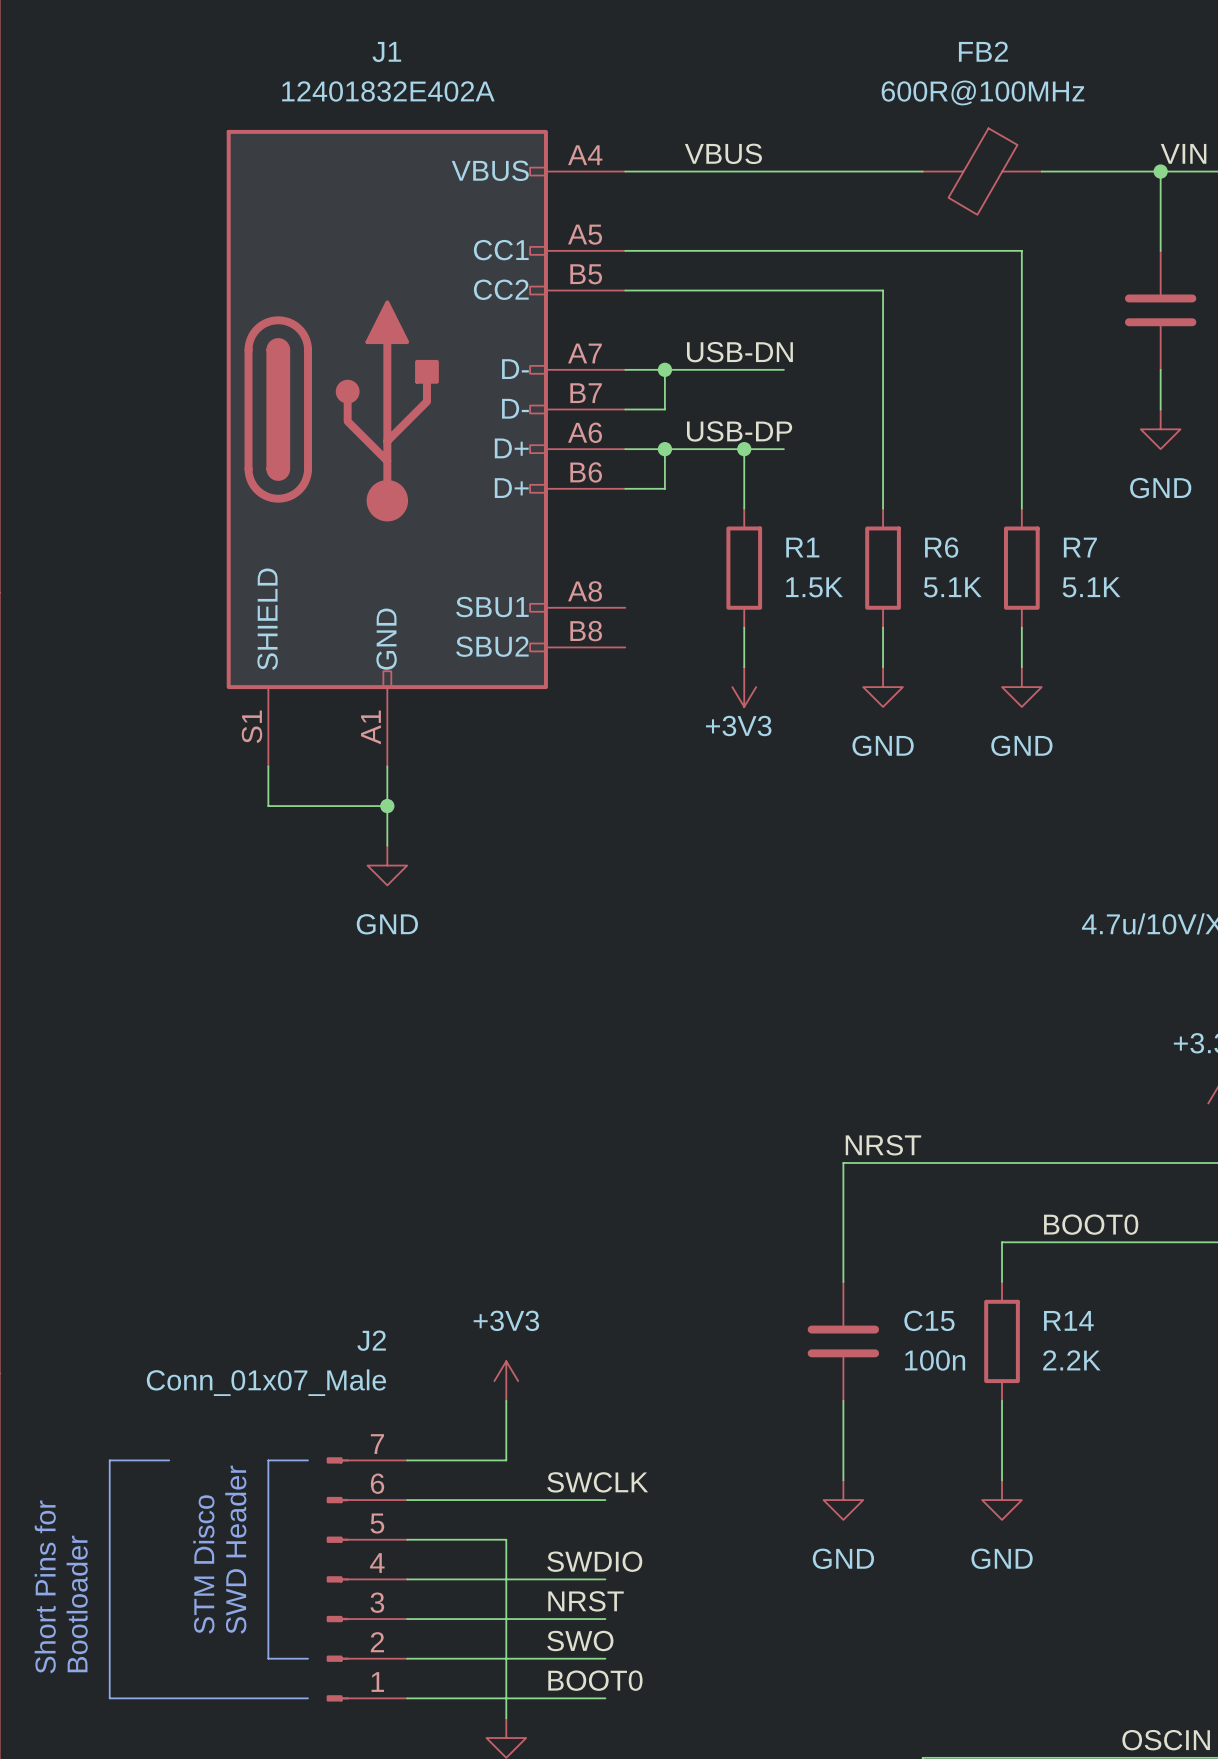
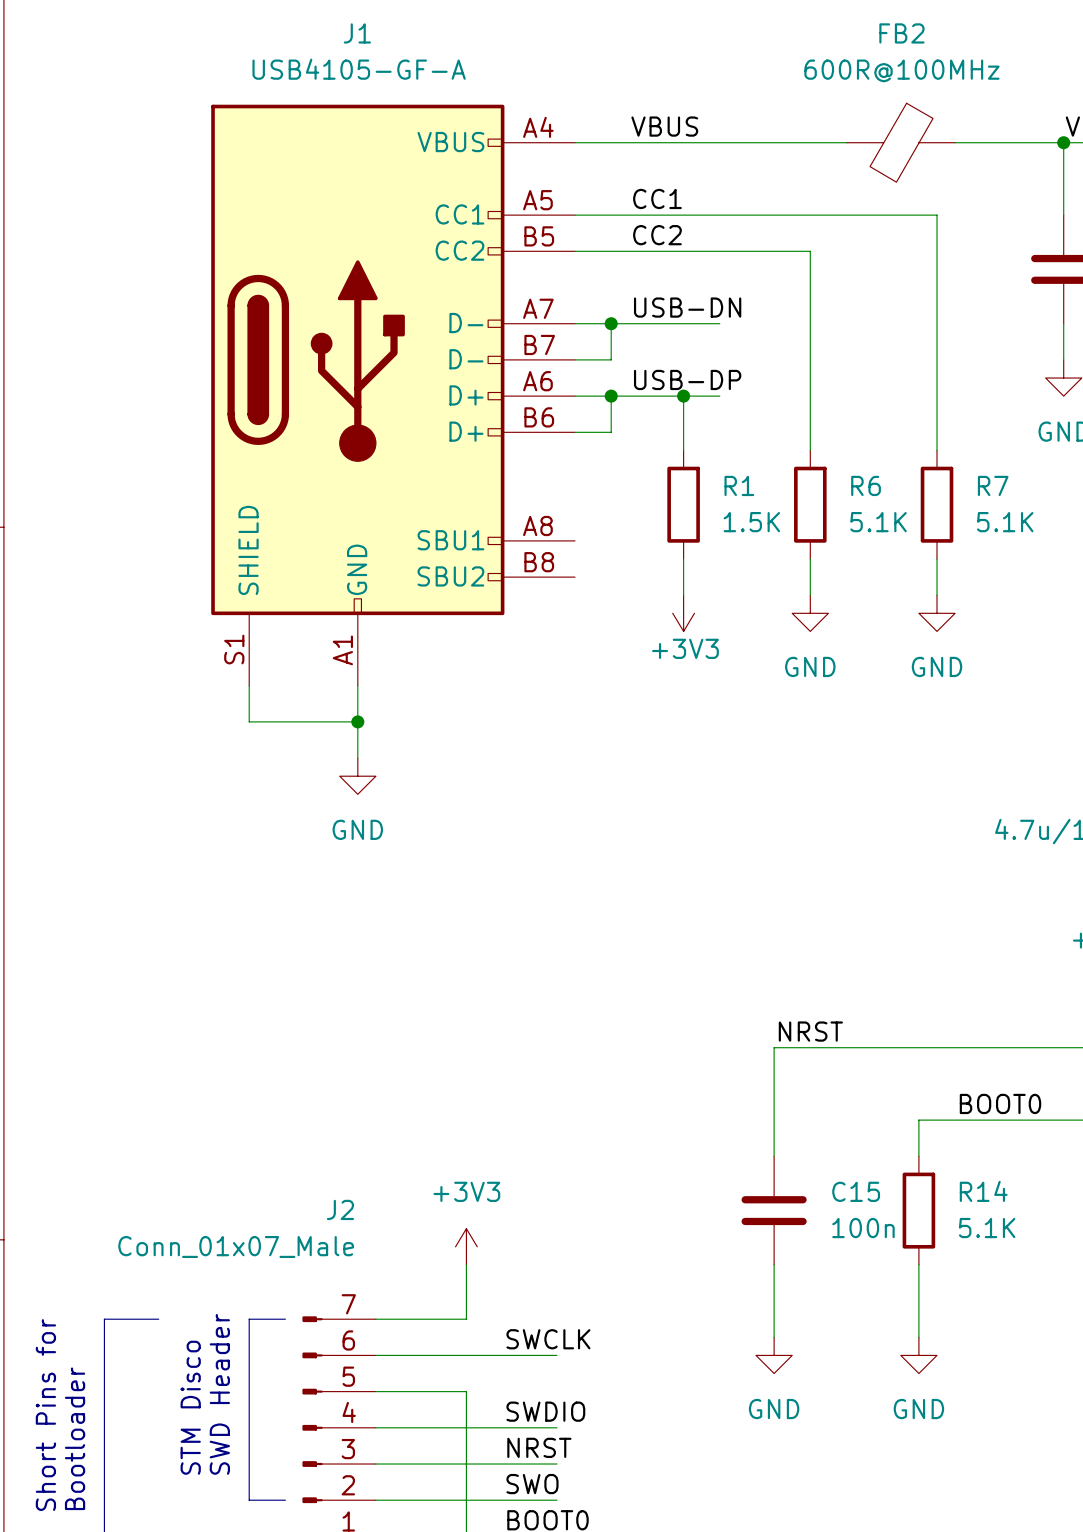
J1 value: 12401832E402A (388, 91) -> USB4105-GF-A (359, 69)
label: none -> CC1 (657, 198)
label: none -> CC2 (657, 235)
R14 value: 2.2K (1071, 1360) -> 5.1K (987, 1228)

